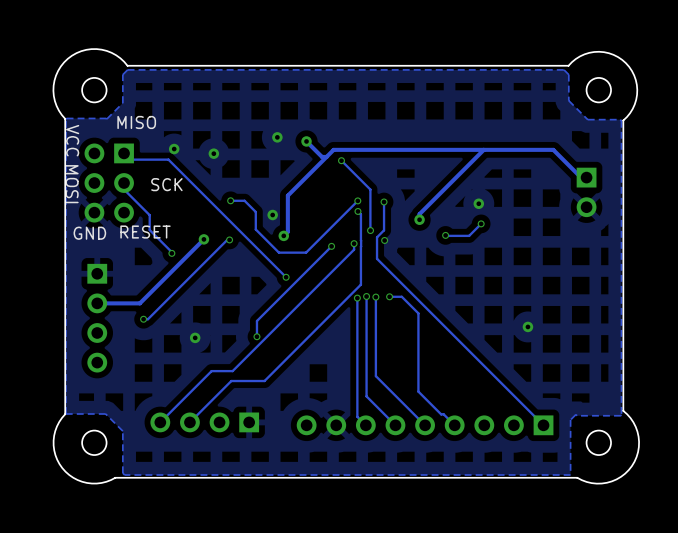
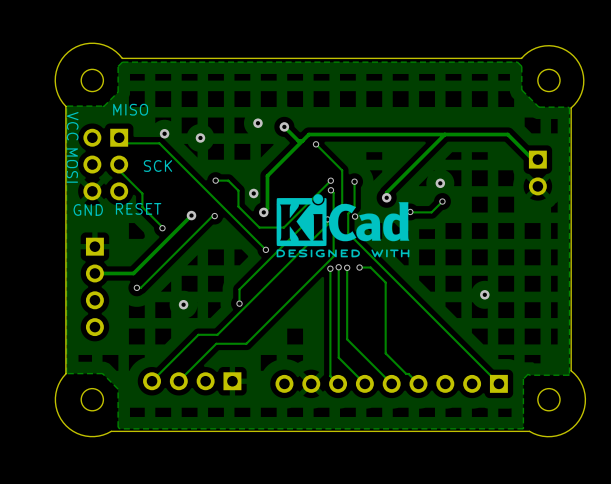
drawing: none -> [276, 194, 410, 258]

